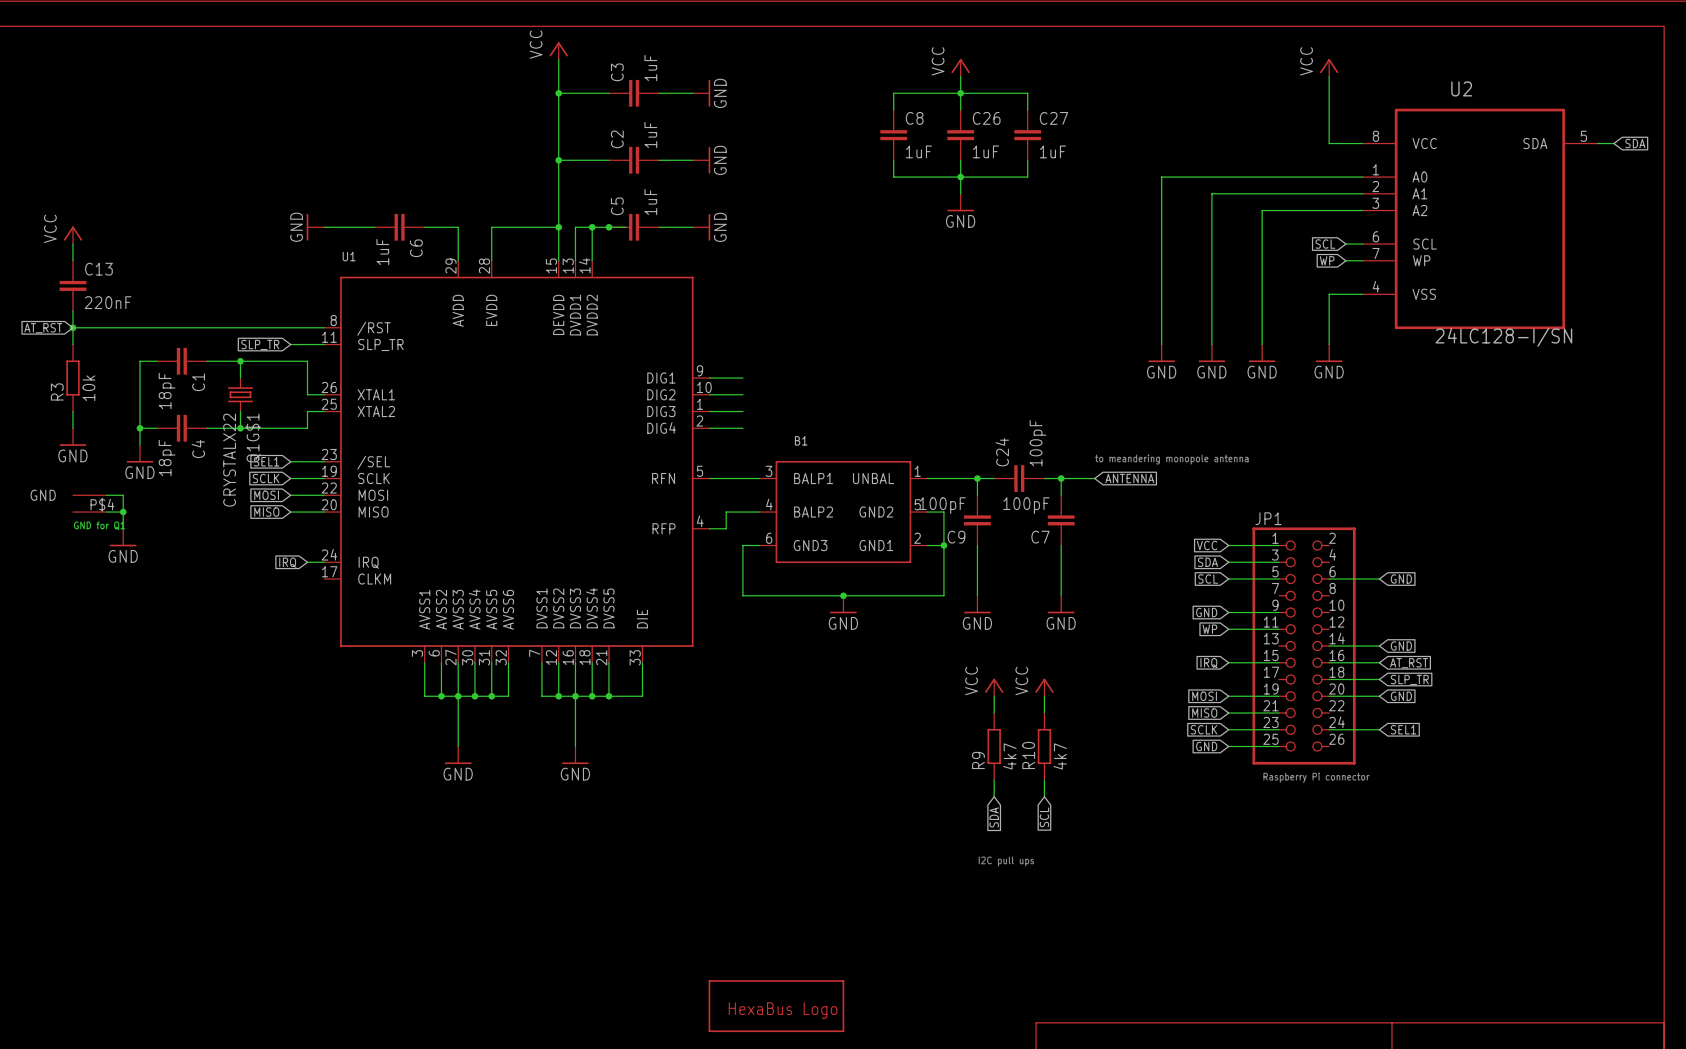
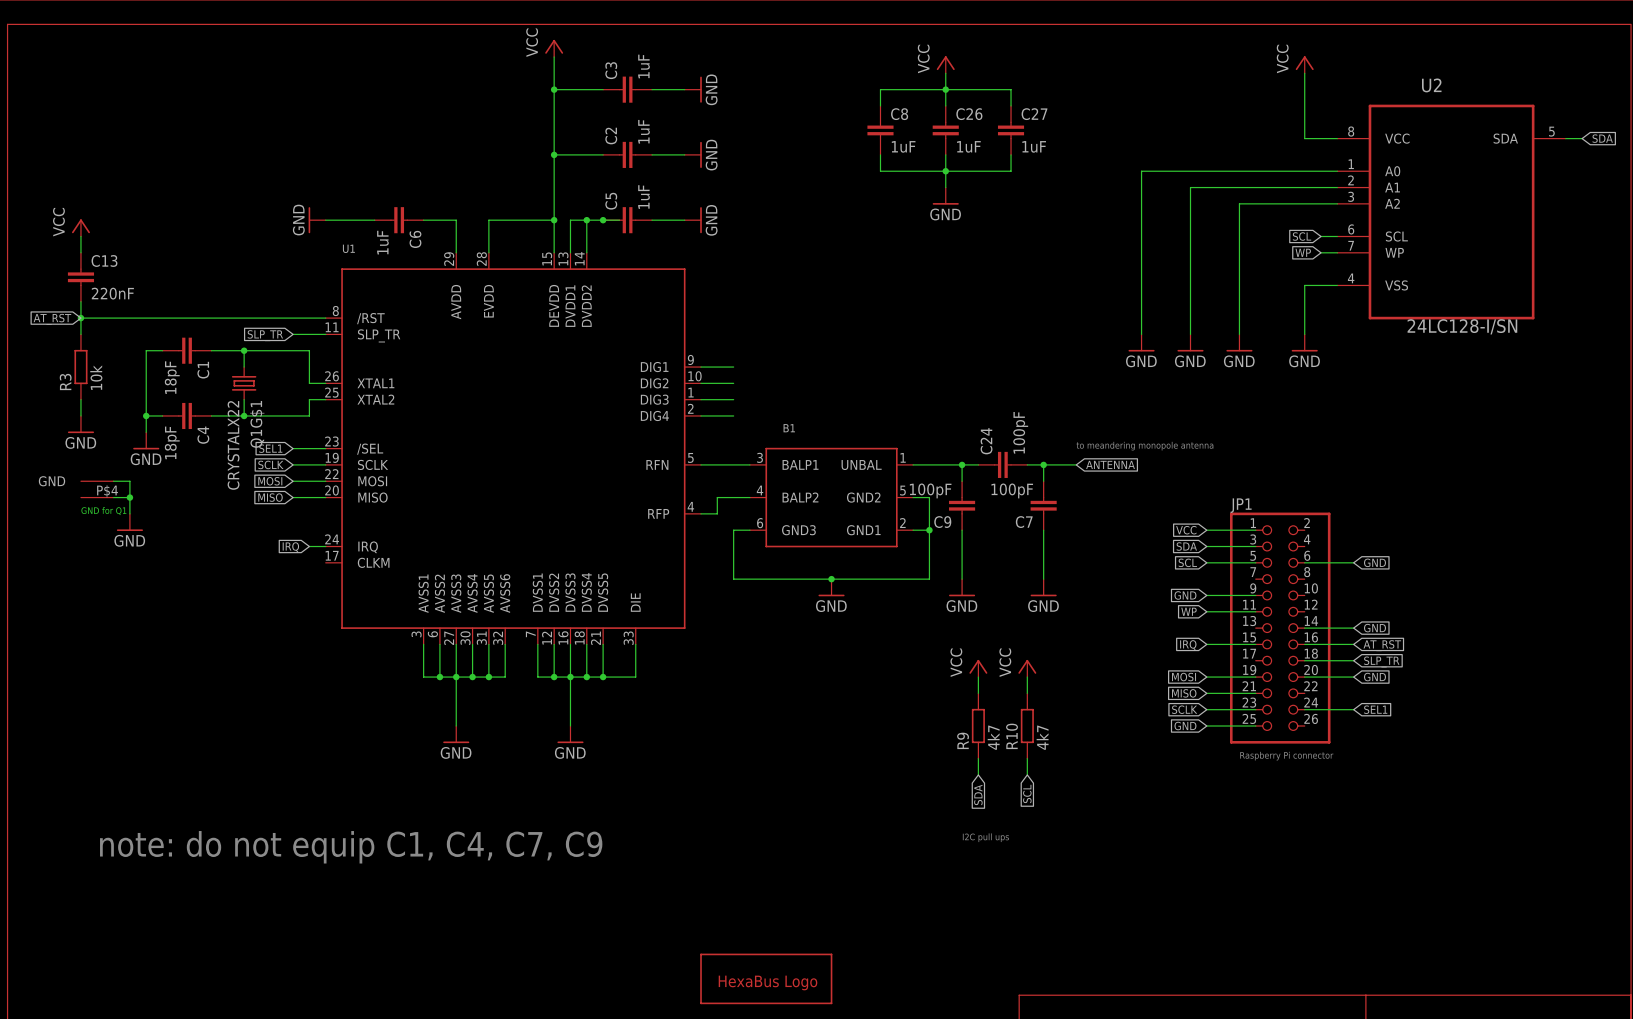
text: none -> note: do not equip C1, C4, C7, C9 (351, 847)

